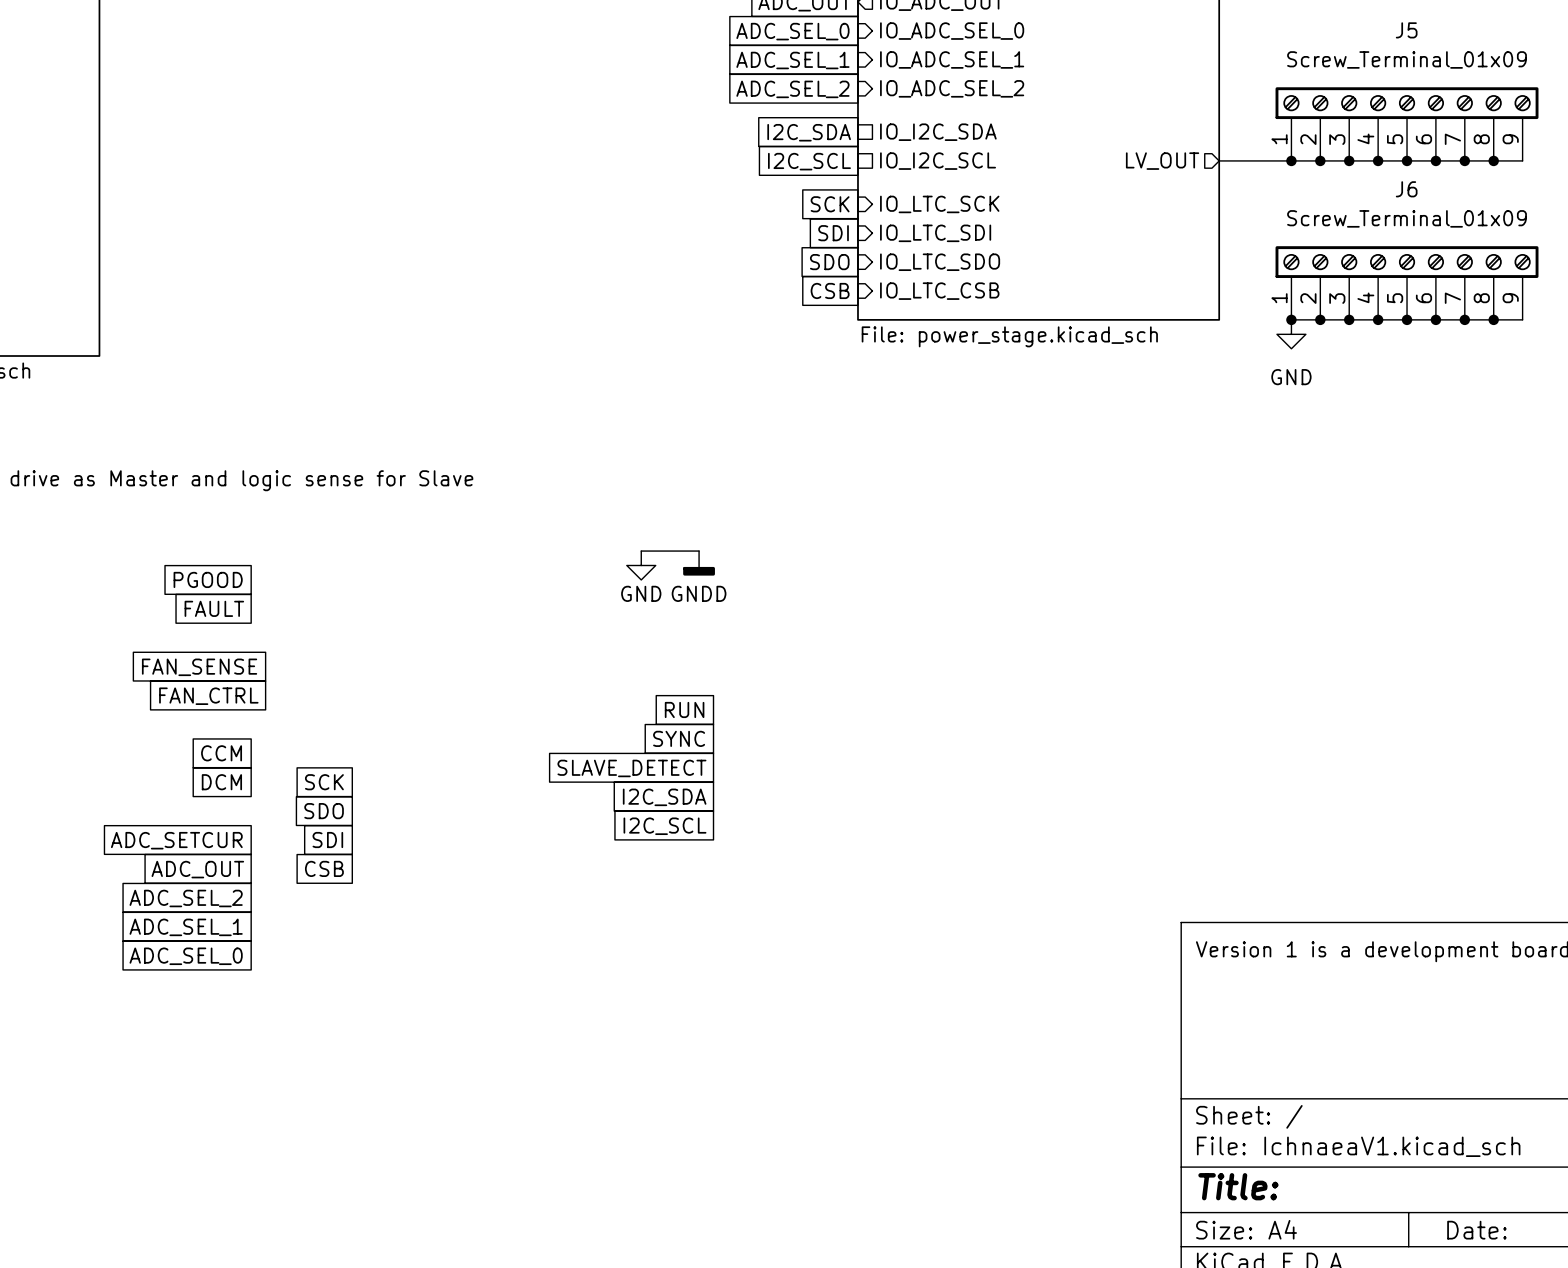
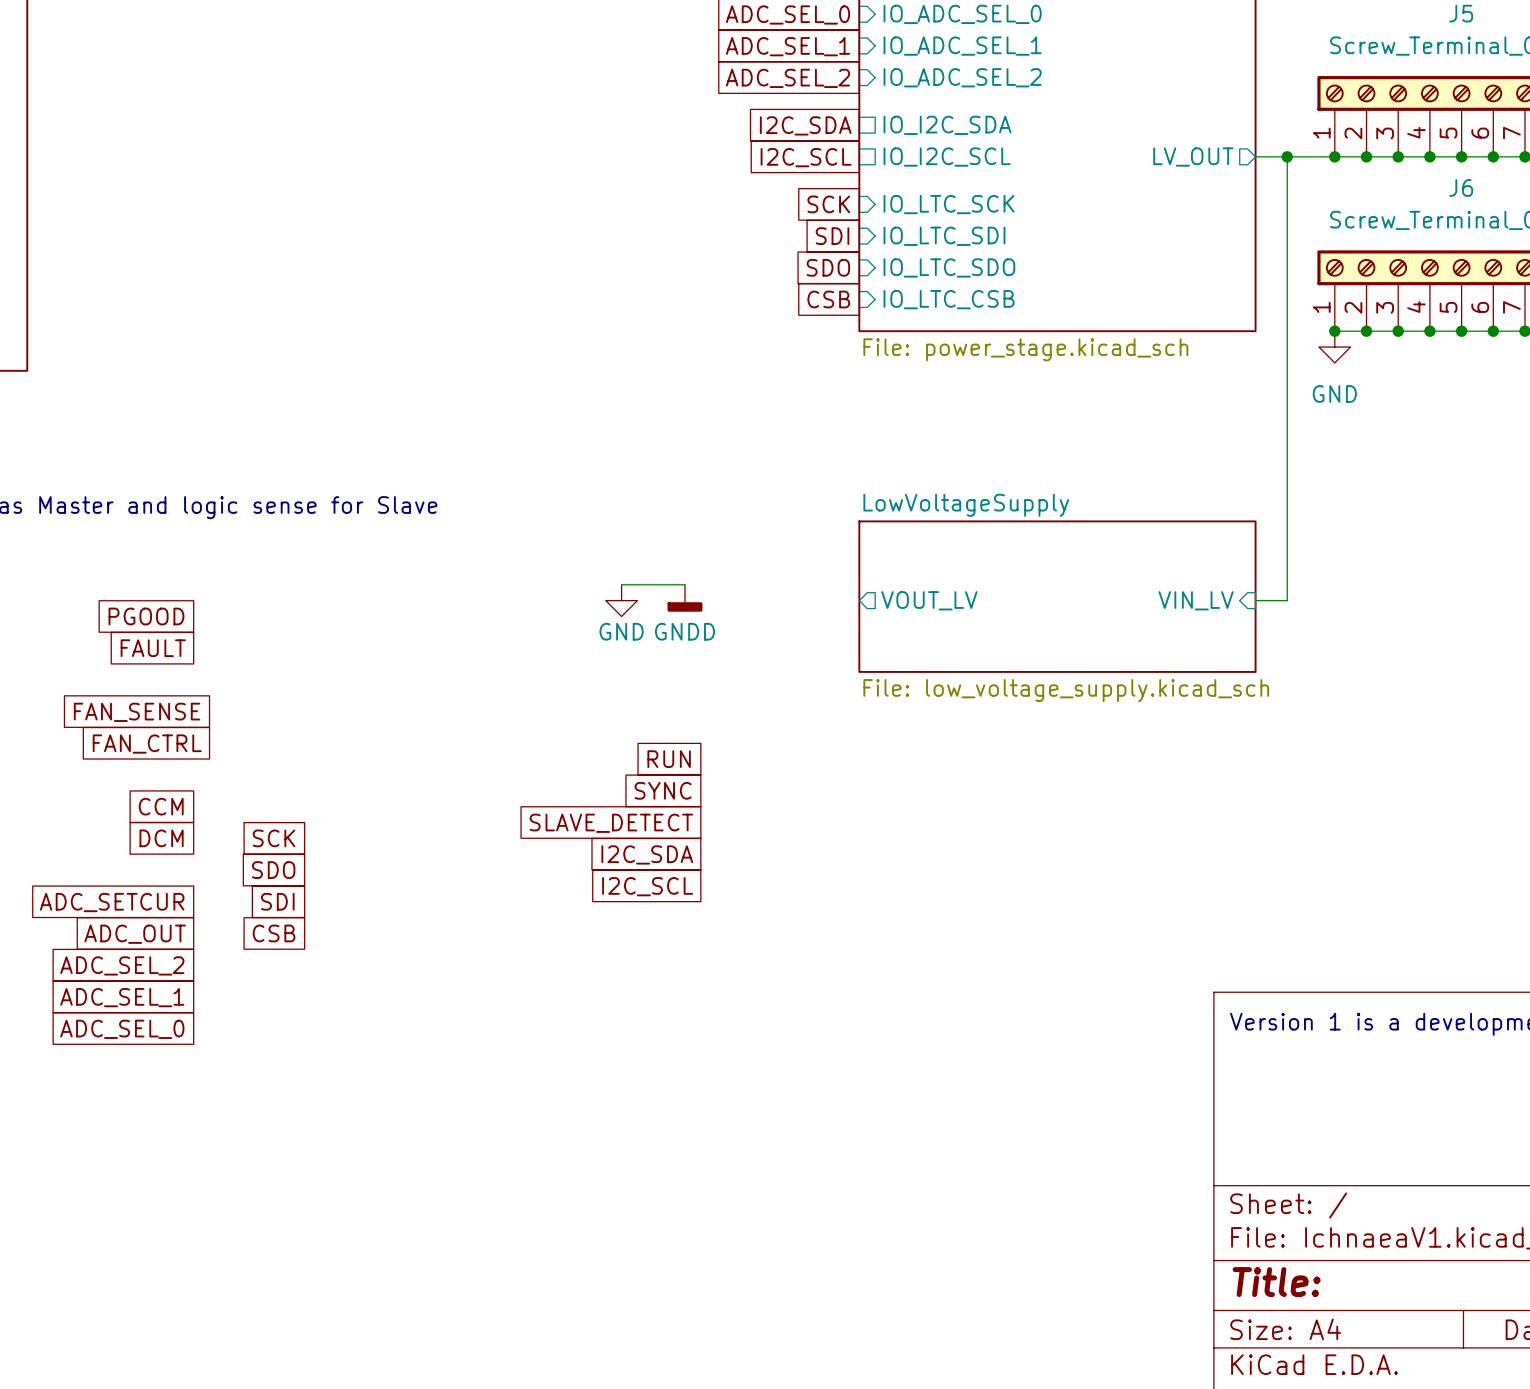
wire: none -> (1287, 156) (1287, 600) (1255, 600)
junction: none -> (1287, 156)
sheet LowVoltageSupply: none -> File: low_voltage_supply.kicad_sch (1057, 596)
sheet pin: none -> VOUT_LV (929, 600)
sheet pin: none -> VIN_LV (1196, 600)

